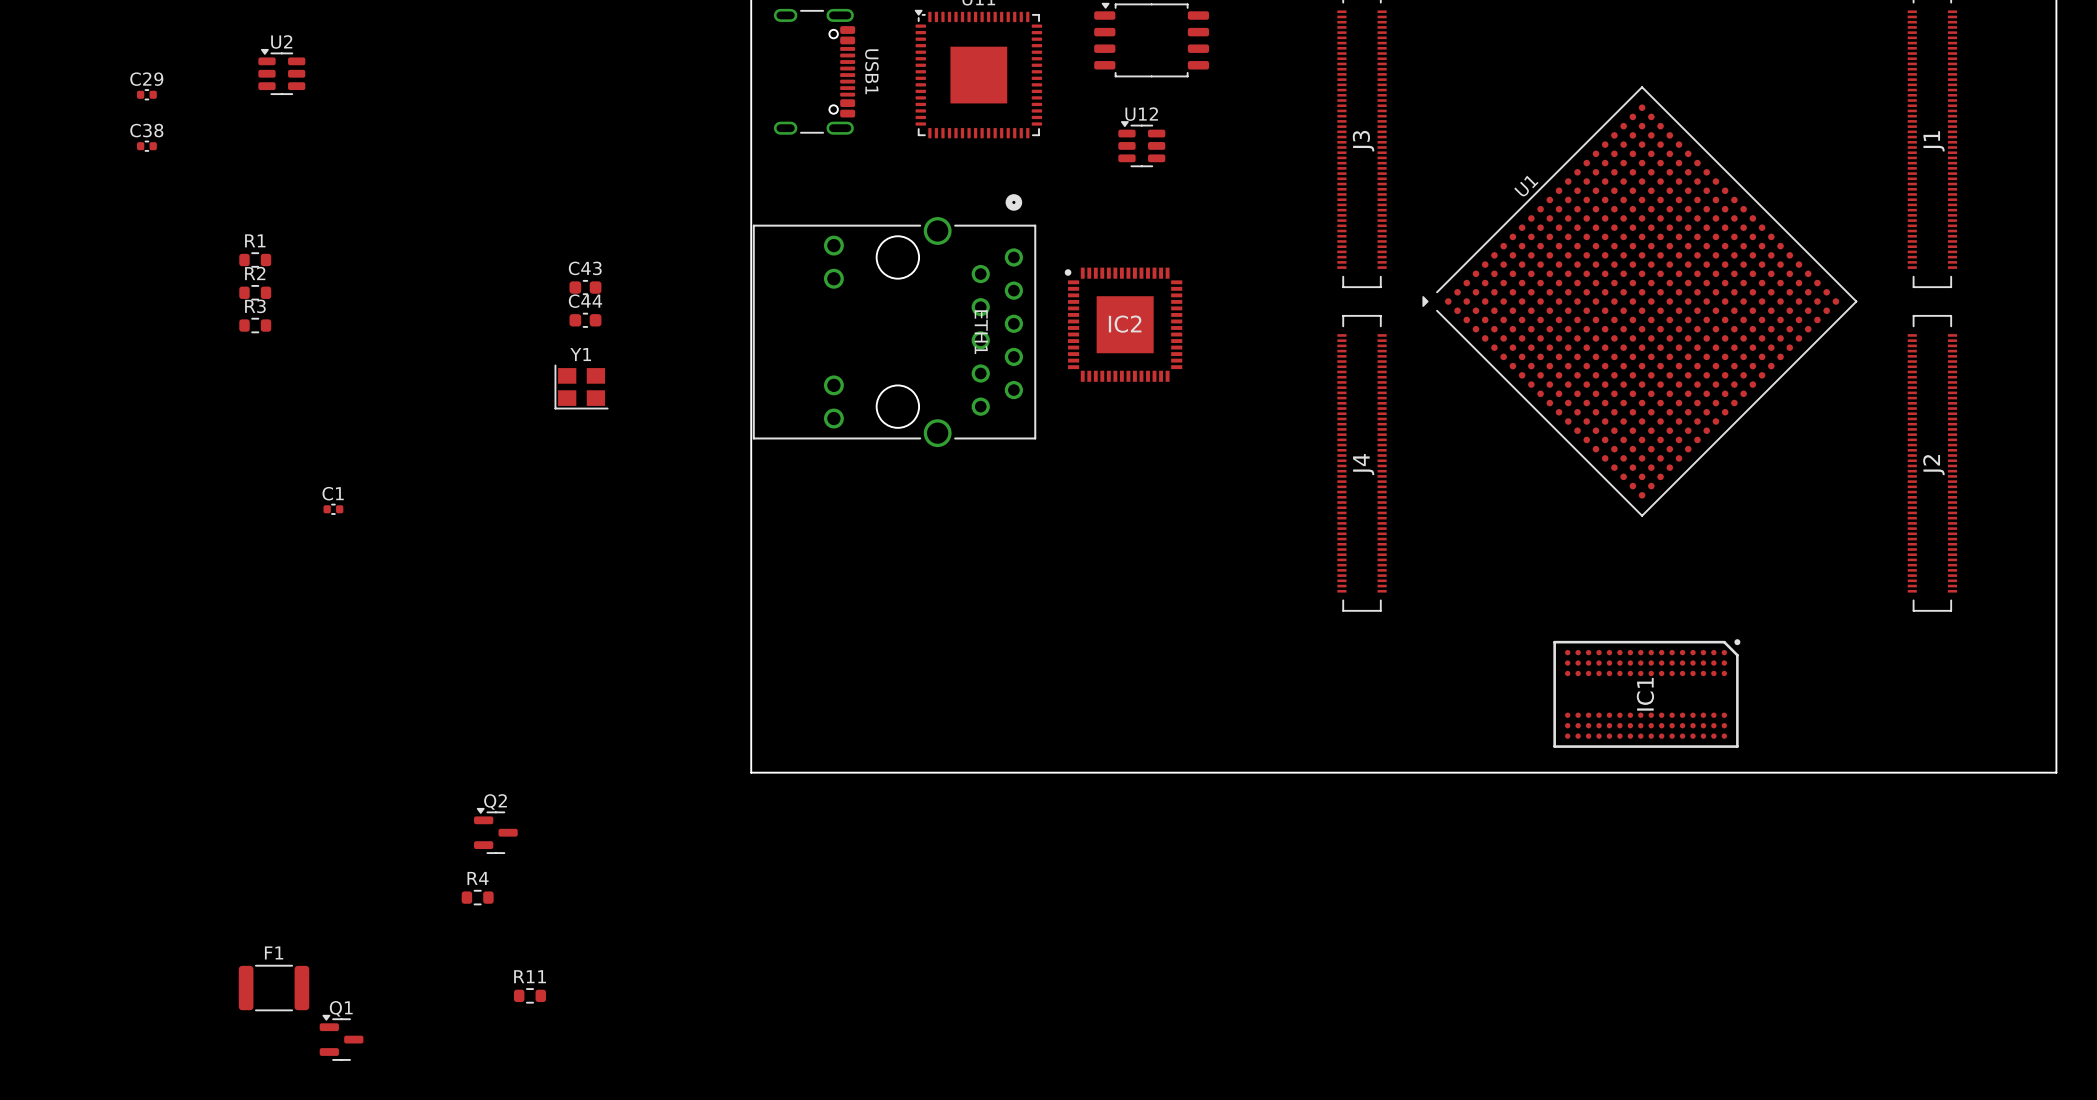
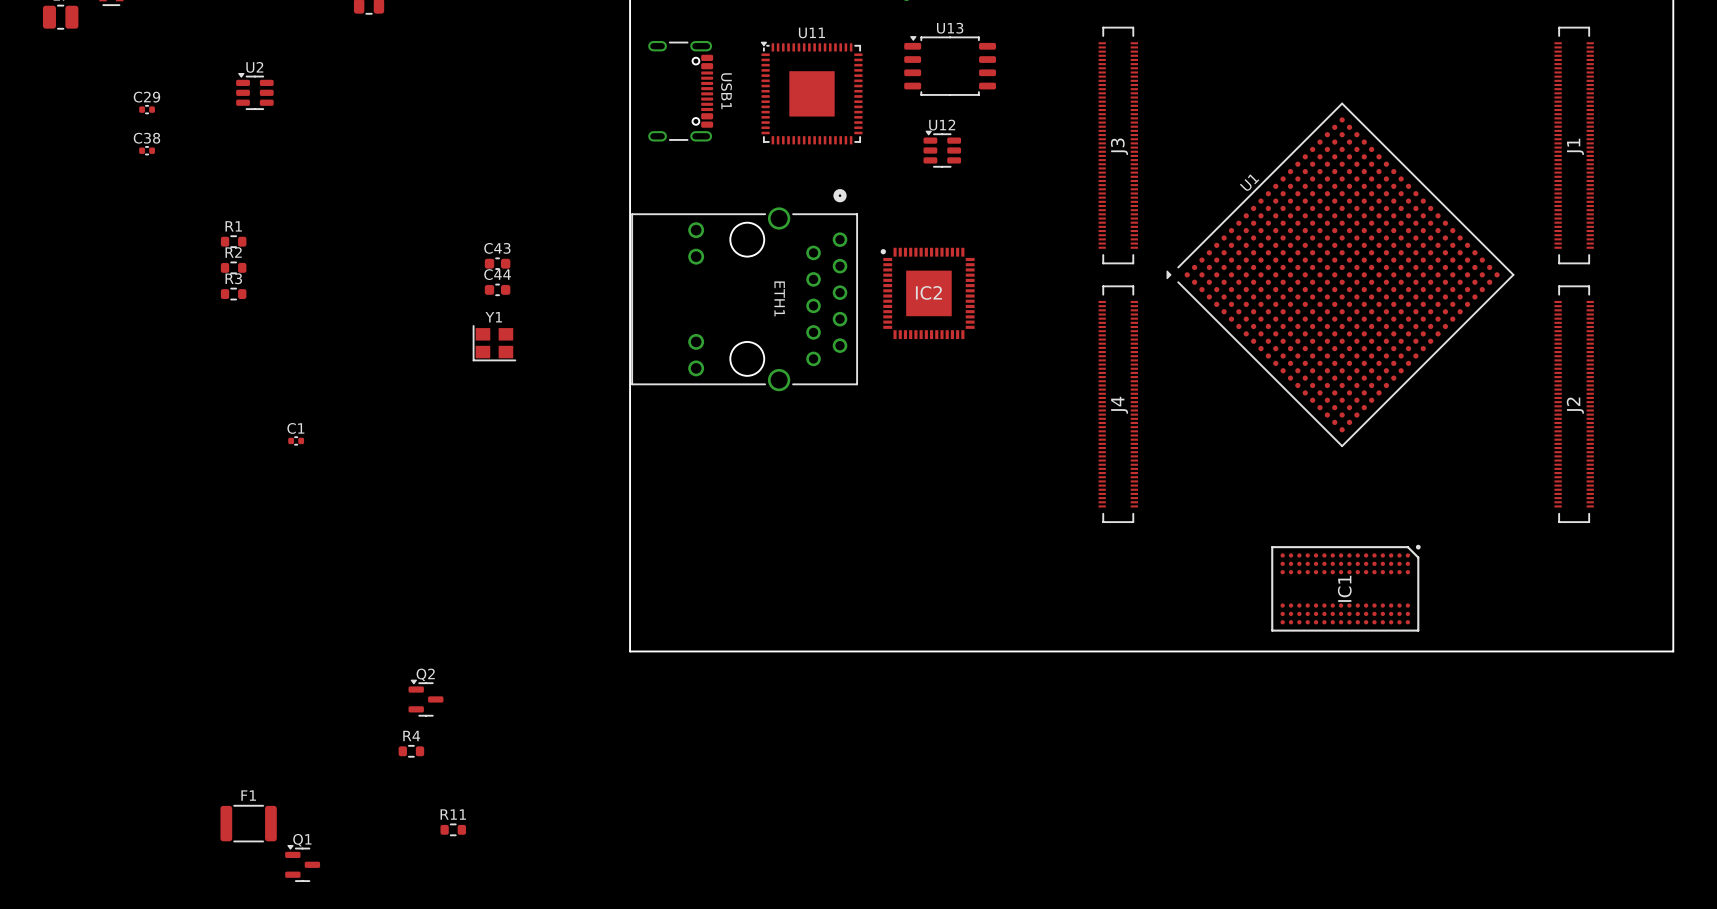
ETH1 name position: ETH1 (981, 332) -> ETH1 (779, 298)

